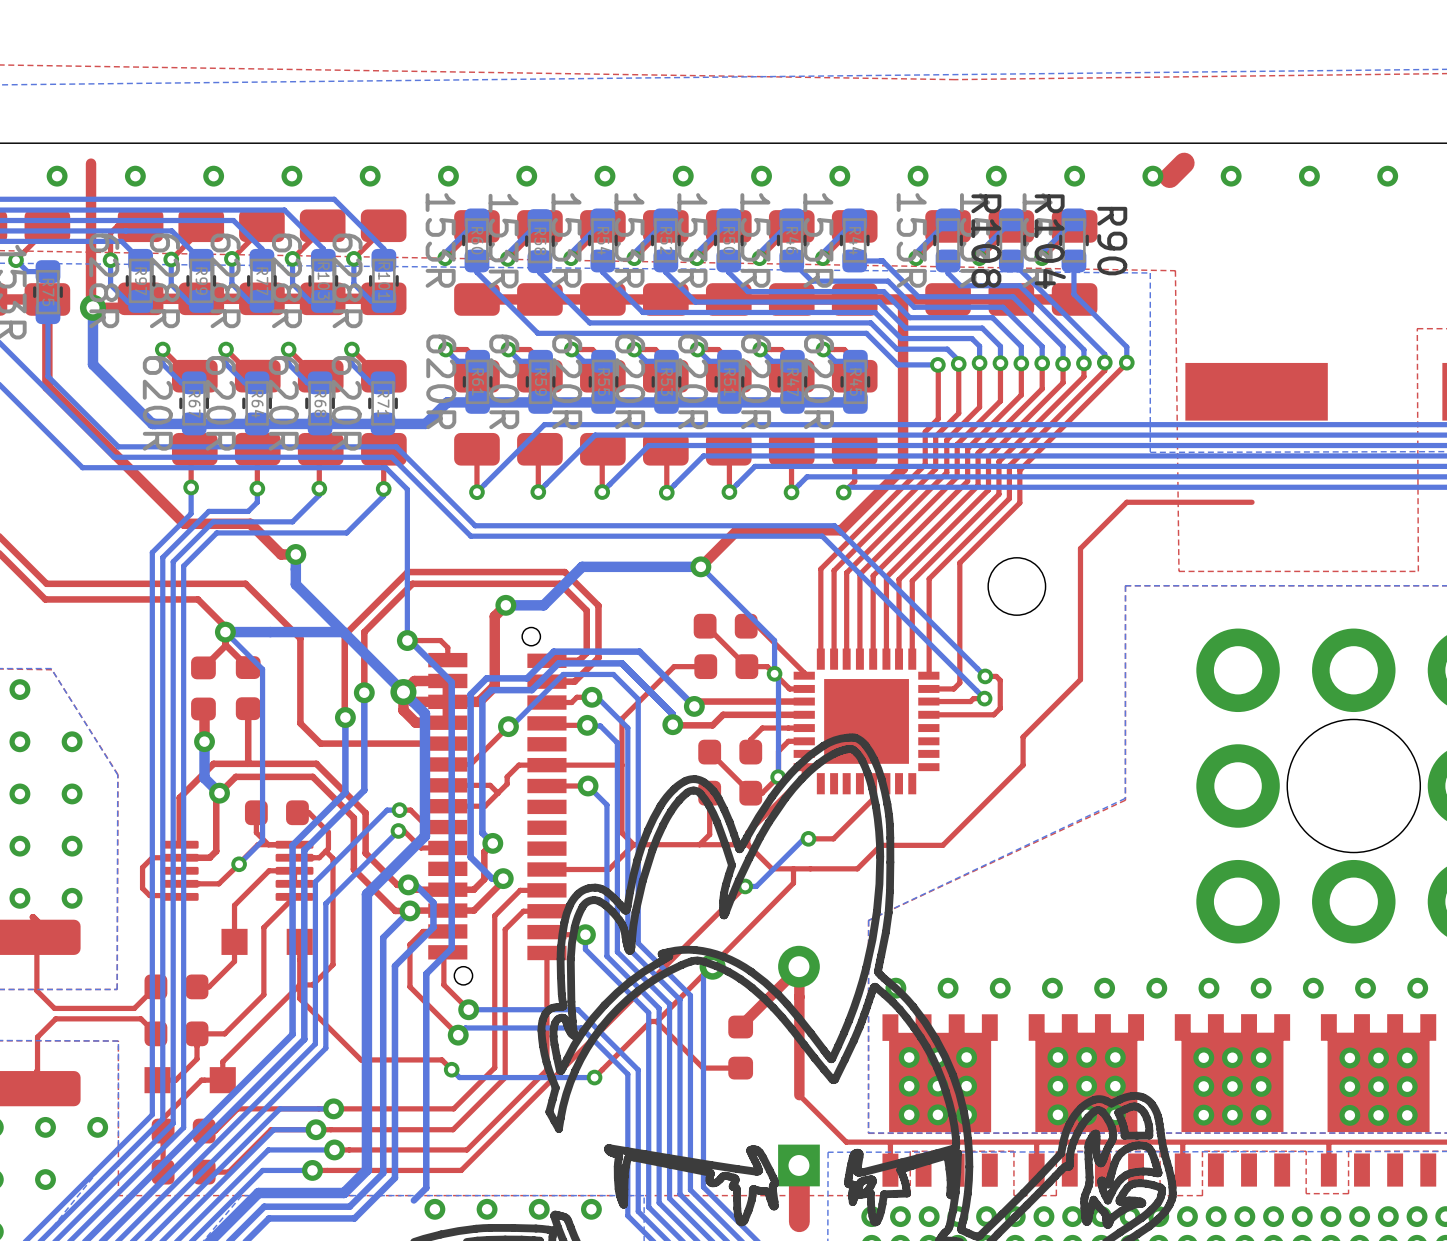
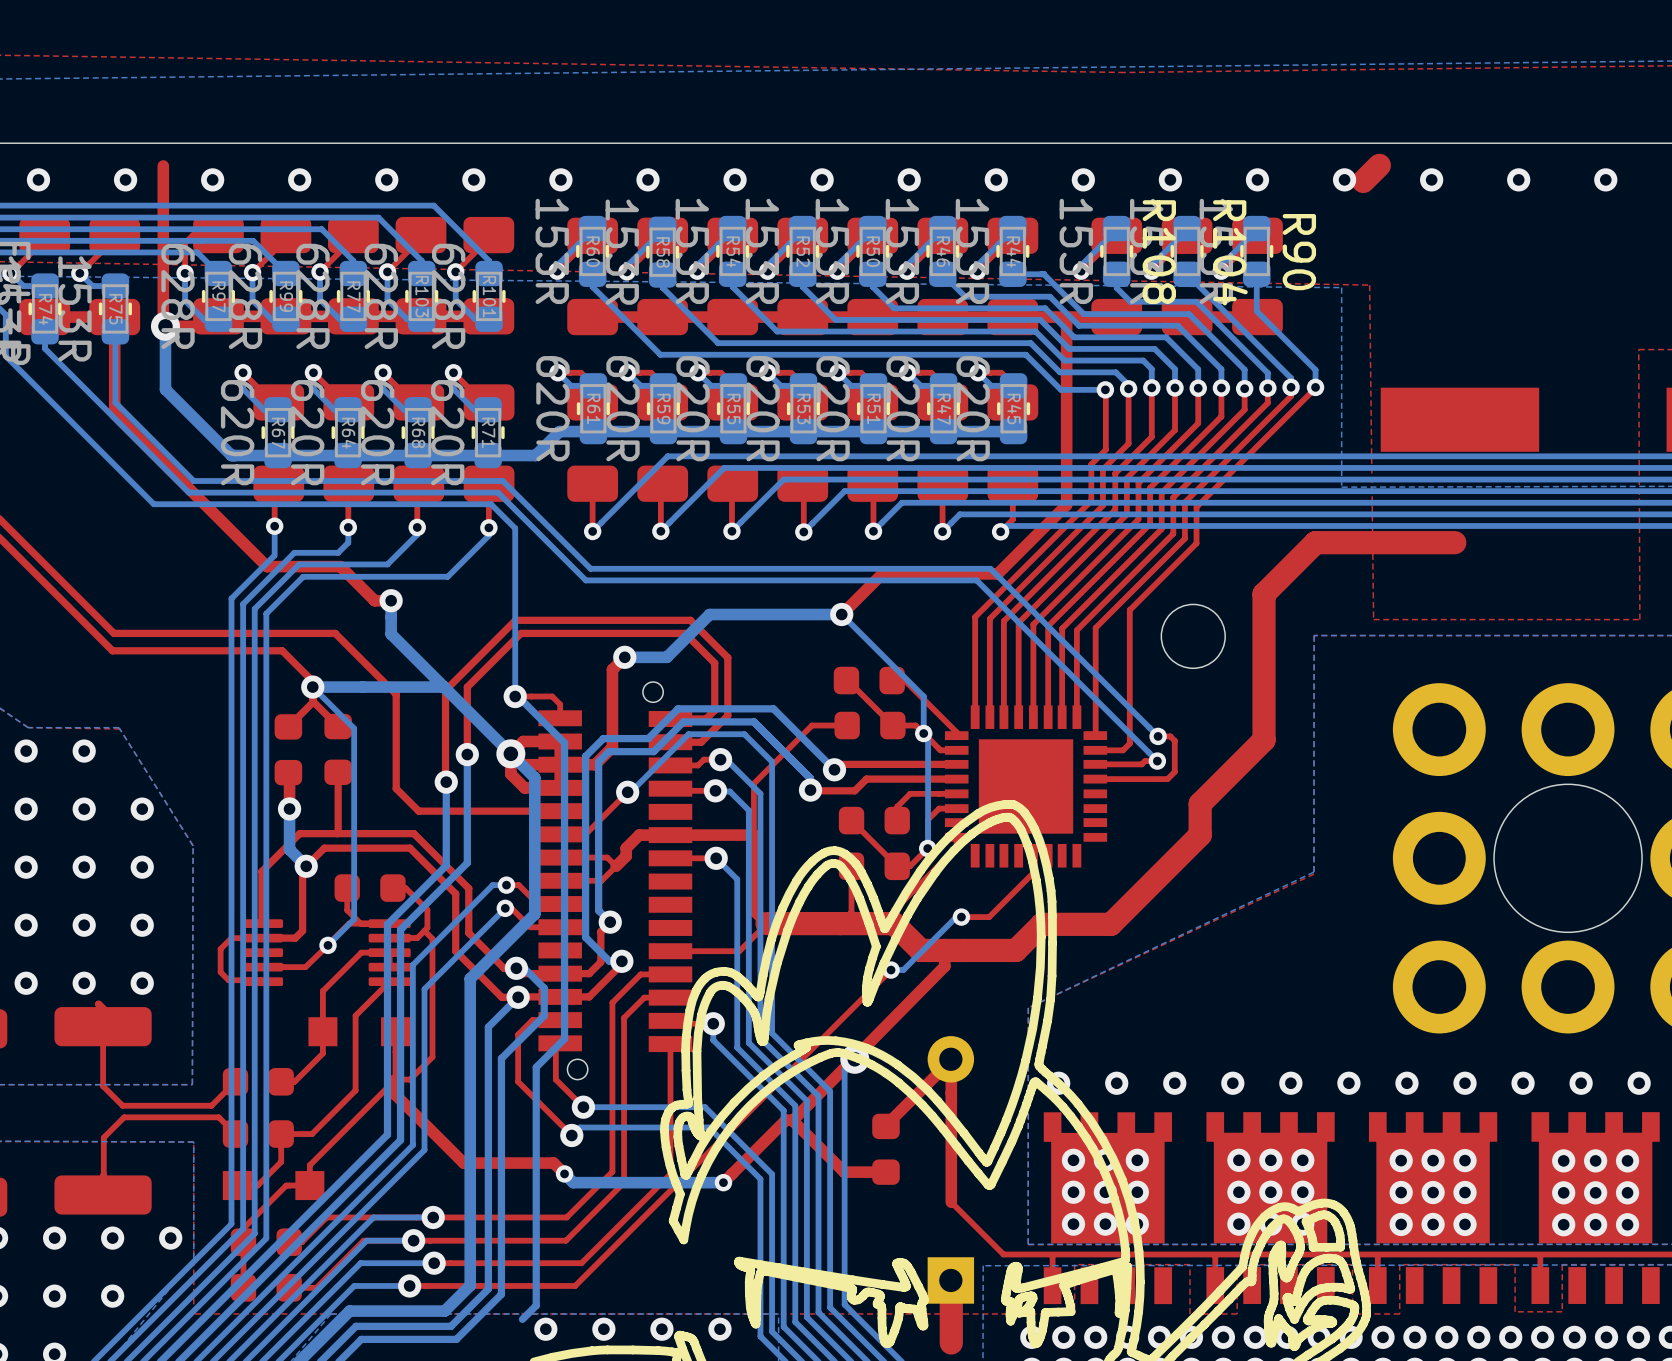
top track width: thin (1252, 502) (1126, 502) (1080, 548) (1080, 679) (1023, 737) (1023, 765) (942, 845) (880, 845) (857, 868) (771, 868) (747, 844) (633, 844) (621, 832) (621, 765) (518, 765) (507, 776) (507, 784) (498, 793) -> thick (1454, 542) (1315, 542) (1264, 594) (1264, 740) (1200, 803) (1200, 835) (1110, 924) (1041, 924) (1015, 950) (920, 950) (893, 923) (766, 923) (753, 910) (753, 835) (639, 835) (626, 848) (626, 856) (616, 866)
top track width: thin (793, 868) (793, 883) (657, 1021) -> thick (944, 950) (944, 966) (793, 1120)
top track width: thin (299, 984) (299, 998) (361, 1059) (441, 1059) (451, 1069) -> thick (395, 1079) (395, 1094) (463, 1163) (553, 1163) (564, 1173)
top track width: thin (657, 1021) (703, 1068) (740, 1068) -> thick (793, 1120) (844, 1172) (885, 1172)
top track width: thin (657, 1021) (650, 1021) (594, 1077) -> thick (793, 1120) (785, 1120) (723, 1182)
bottom track width: thin (451, 1069) (459, 1077) (594, 1077) -> thick (564, 1173) (573, 1182) (723, 1182)

